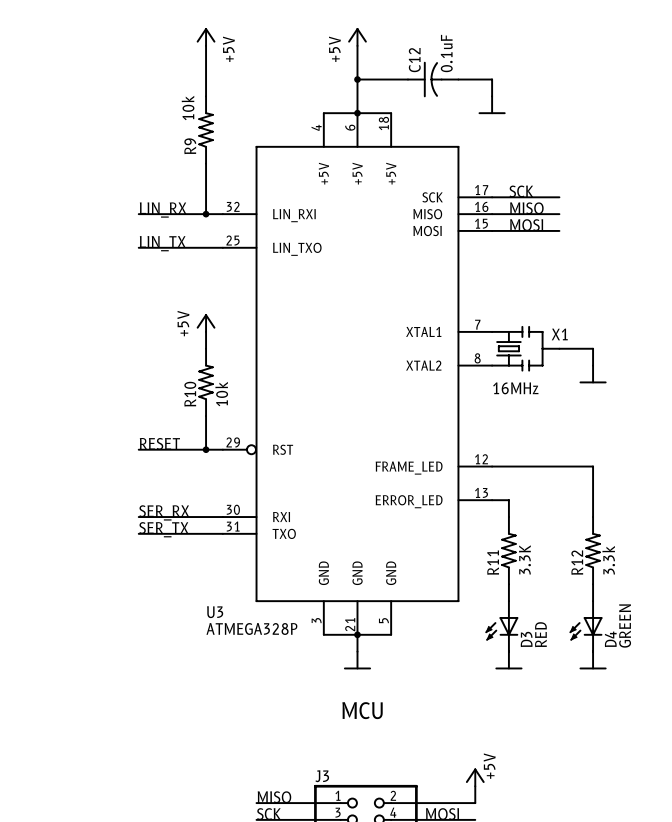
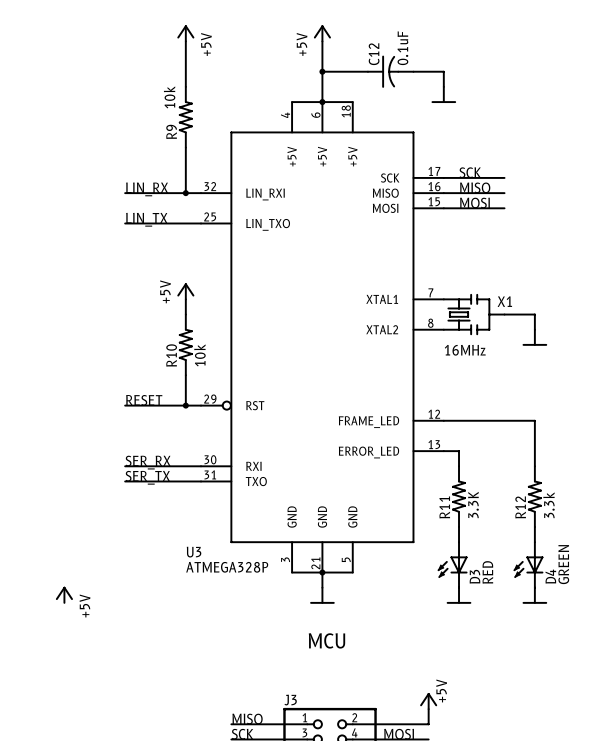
power symbol: none -> +5V (64, 594)

